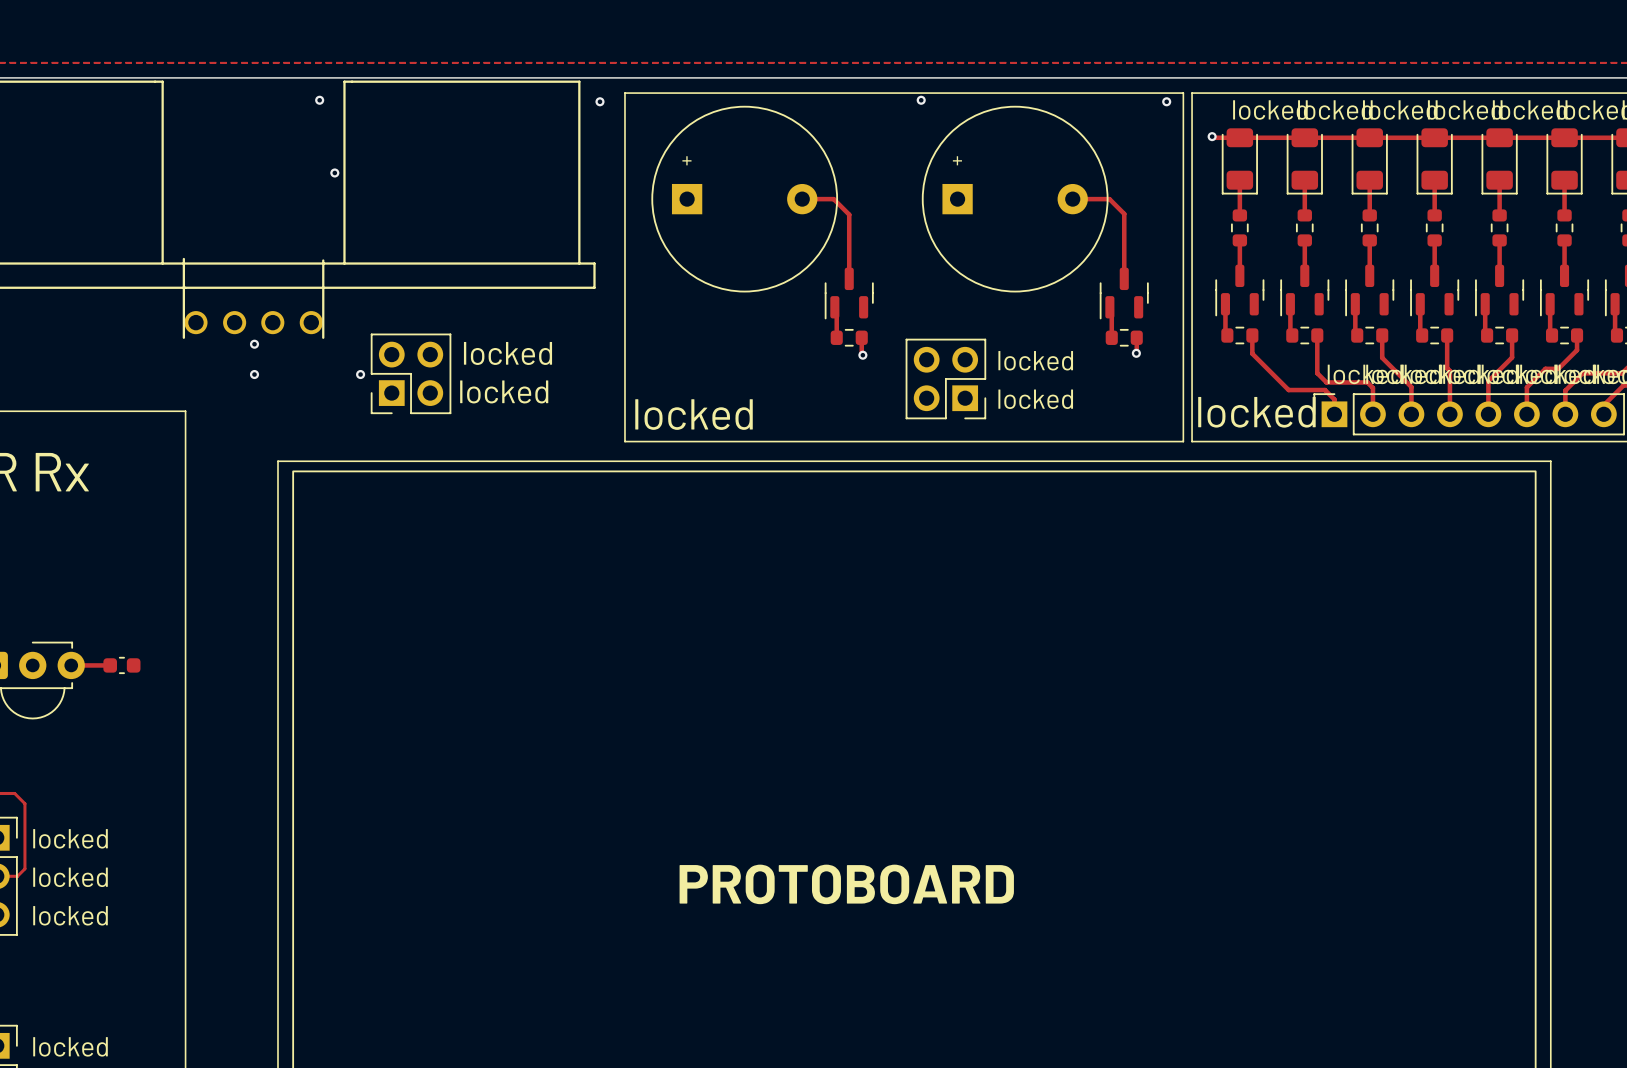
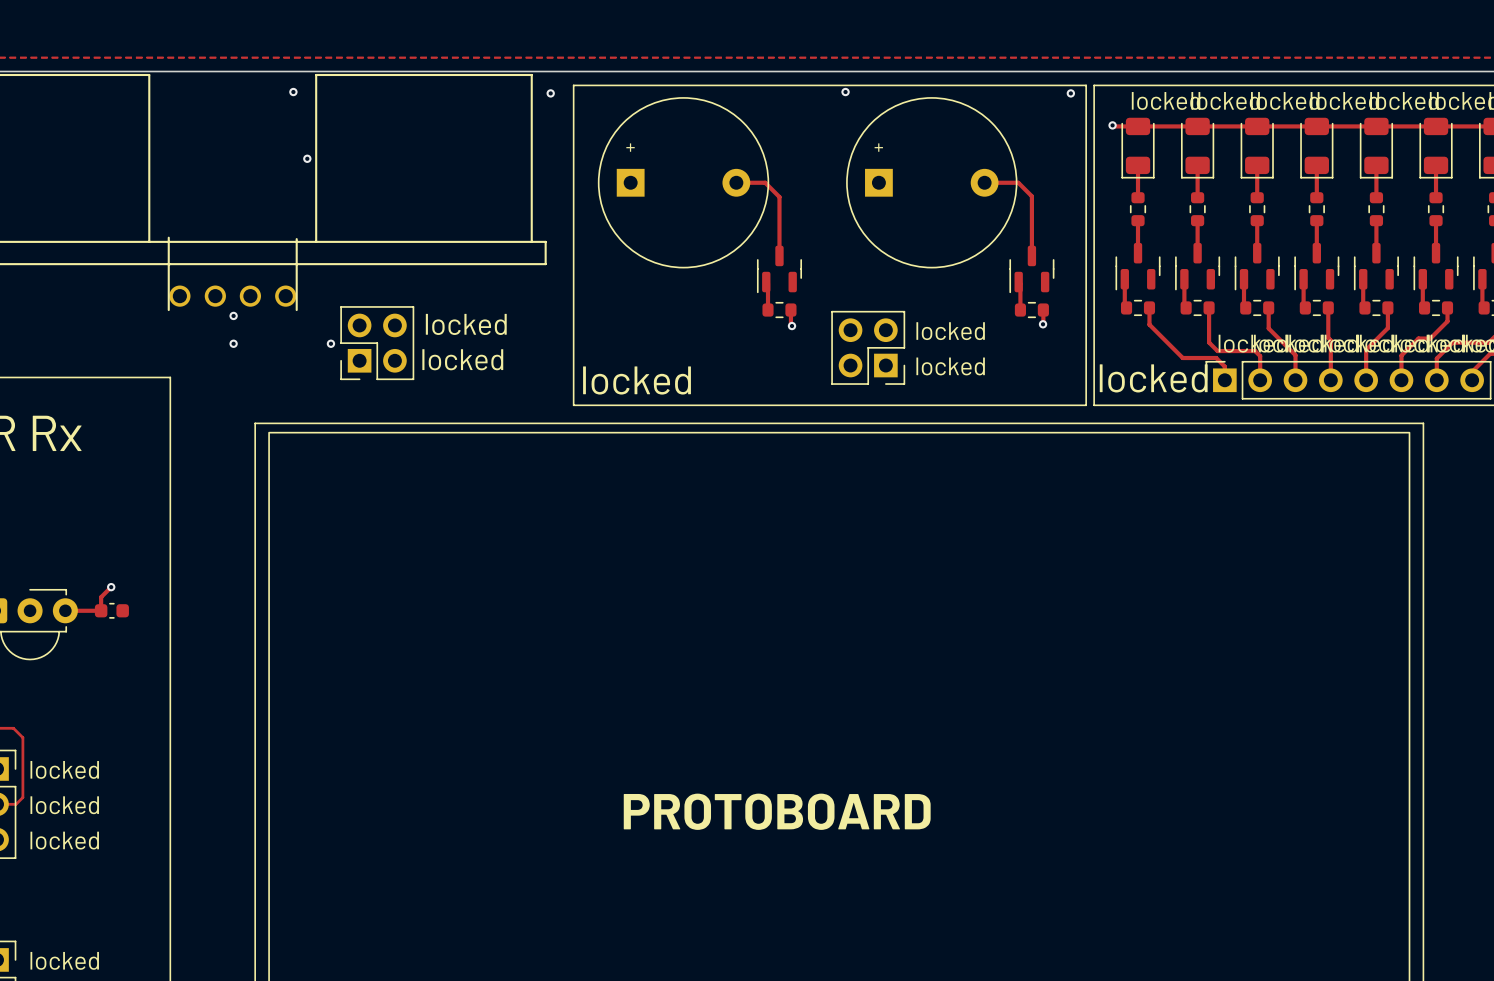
track: none -> (111, 587) (101, 597) (101, 610)
via: none -> (111, 587)

